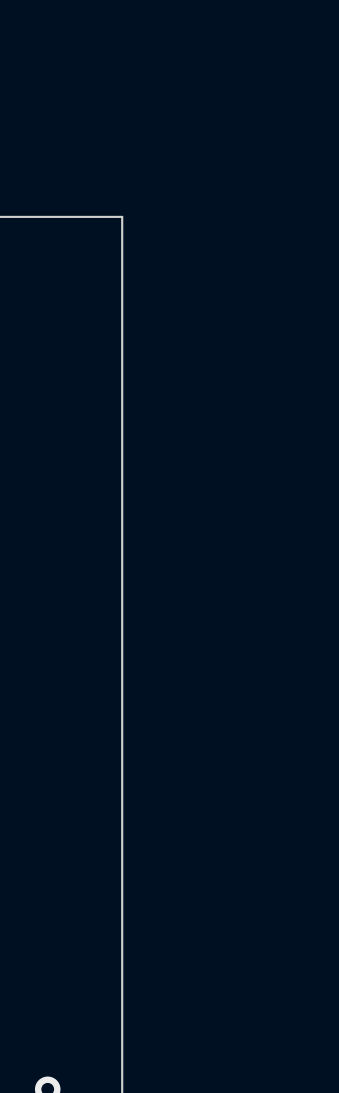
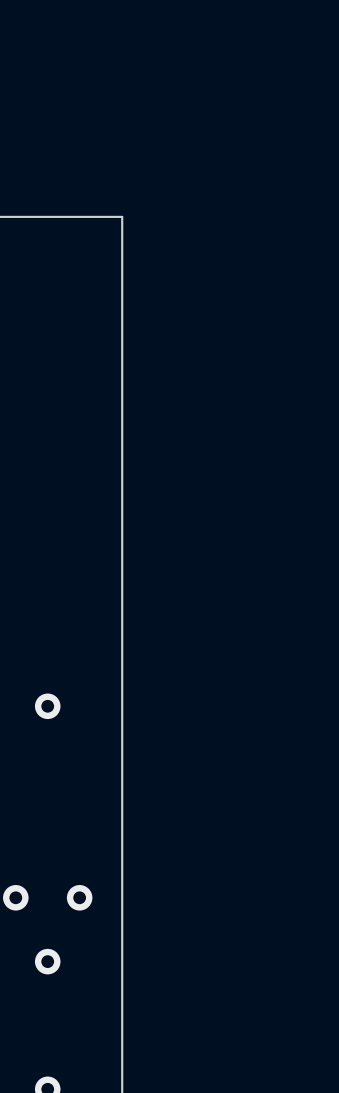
via: none -> (47, 706)
via: none -> (15, 897)
via: none -> (79, 897)
via: none -> (47, 961)

